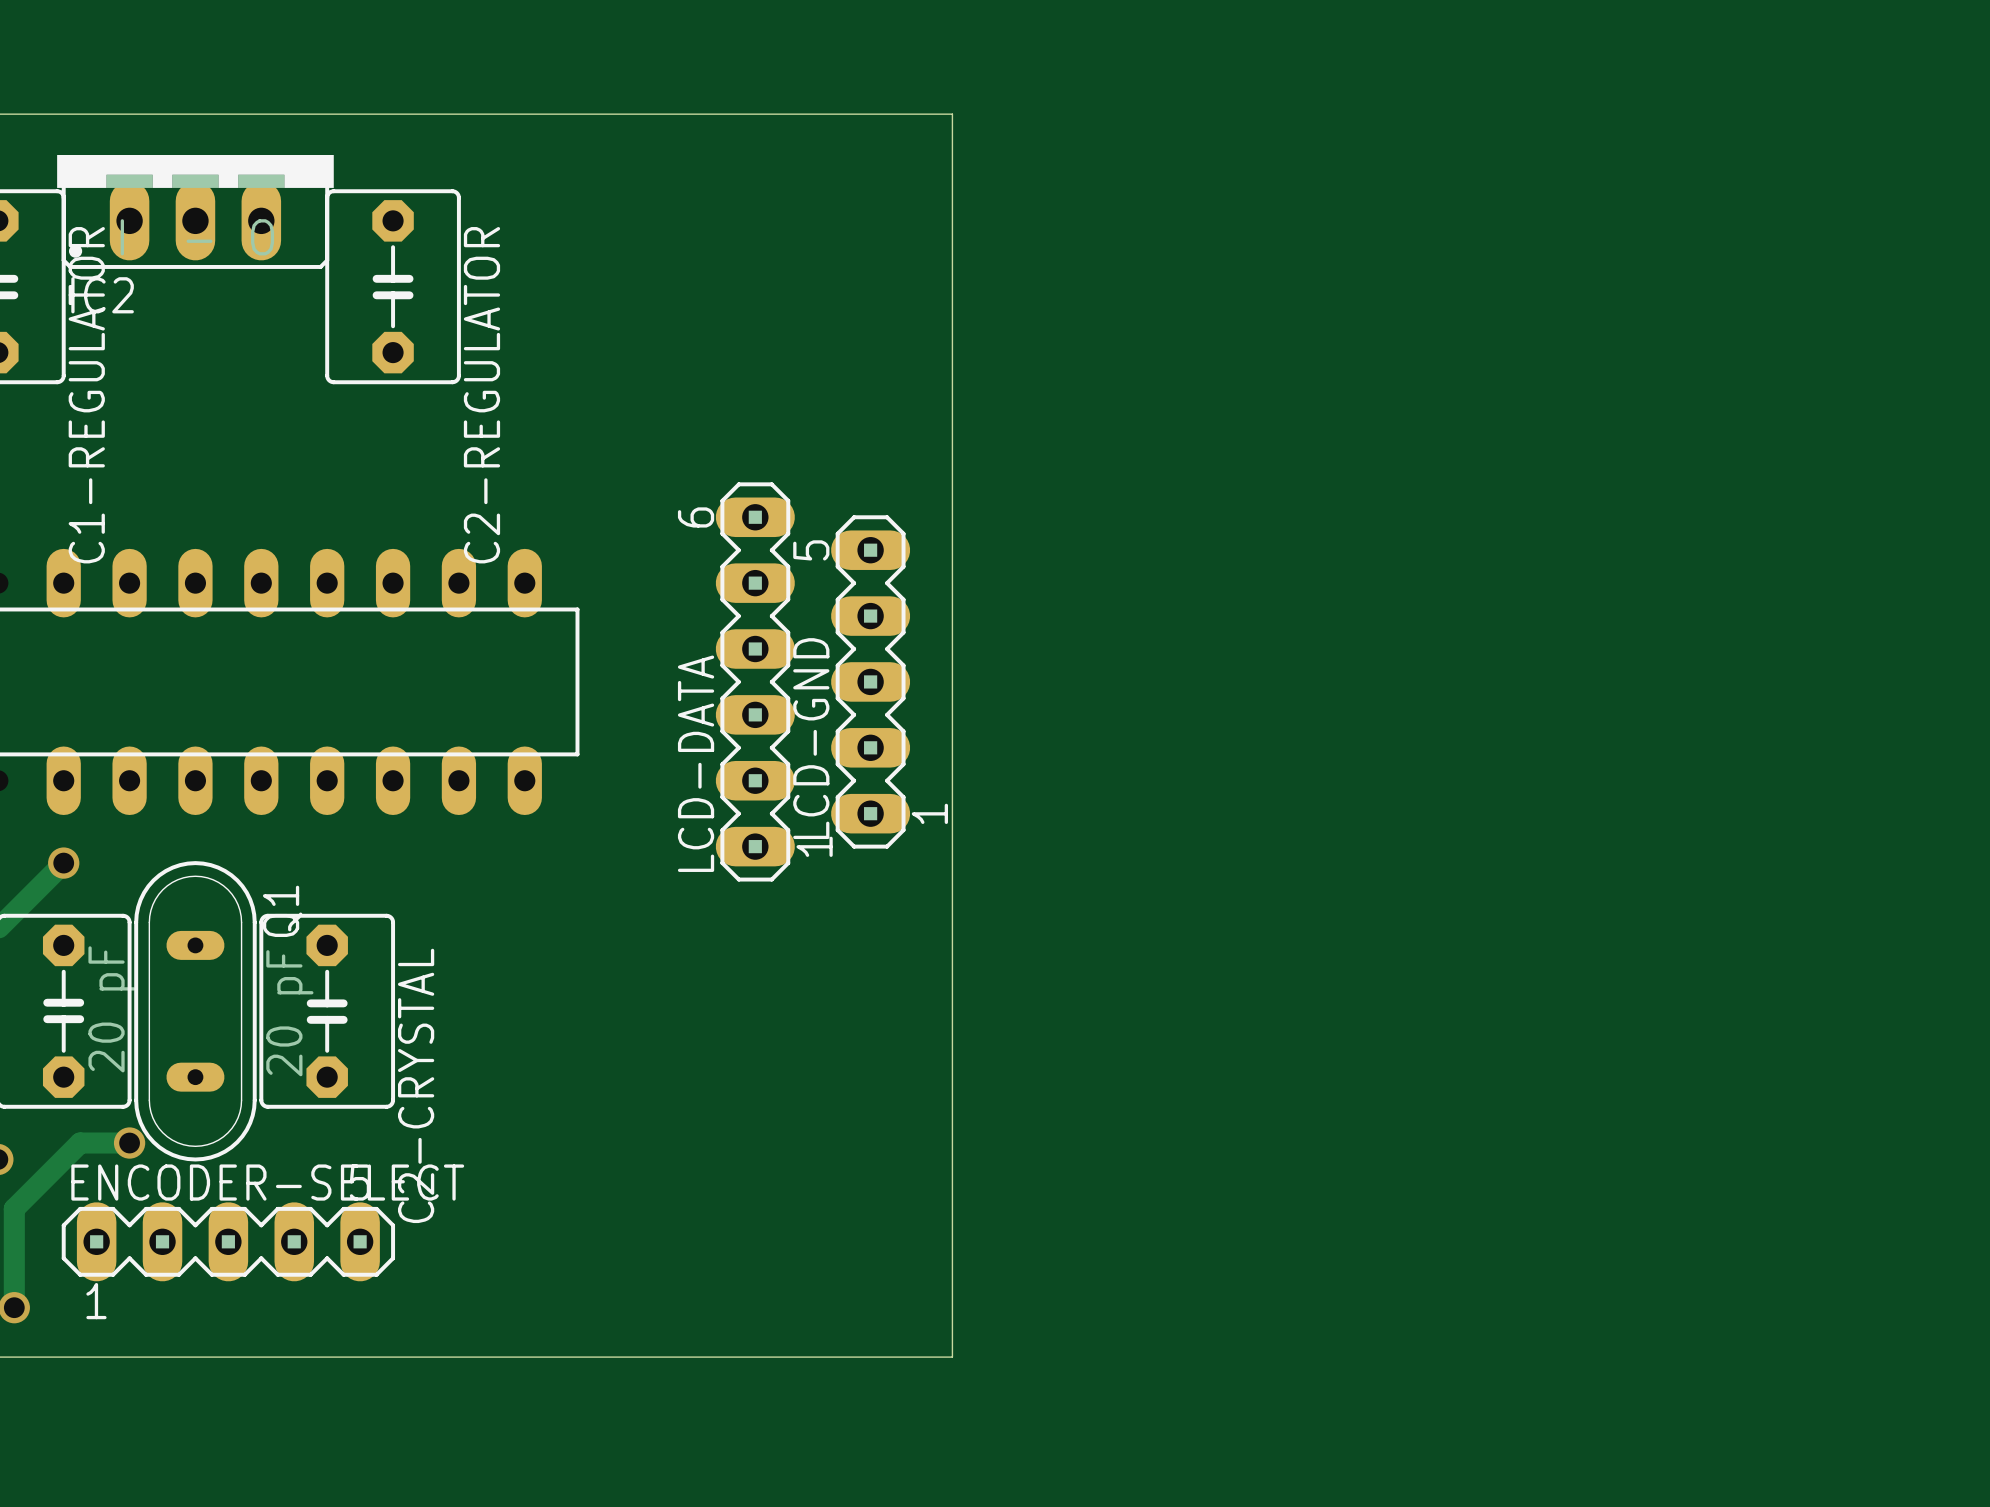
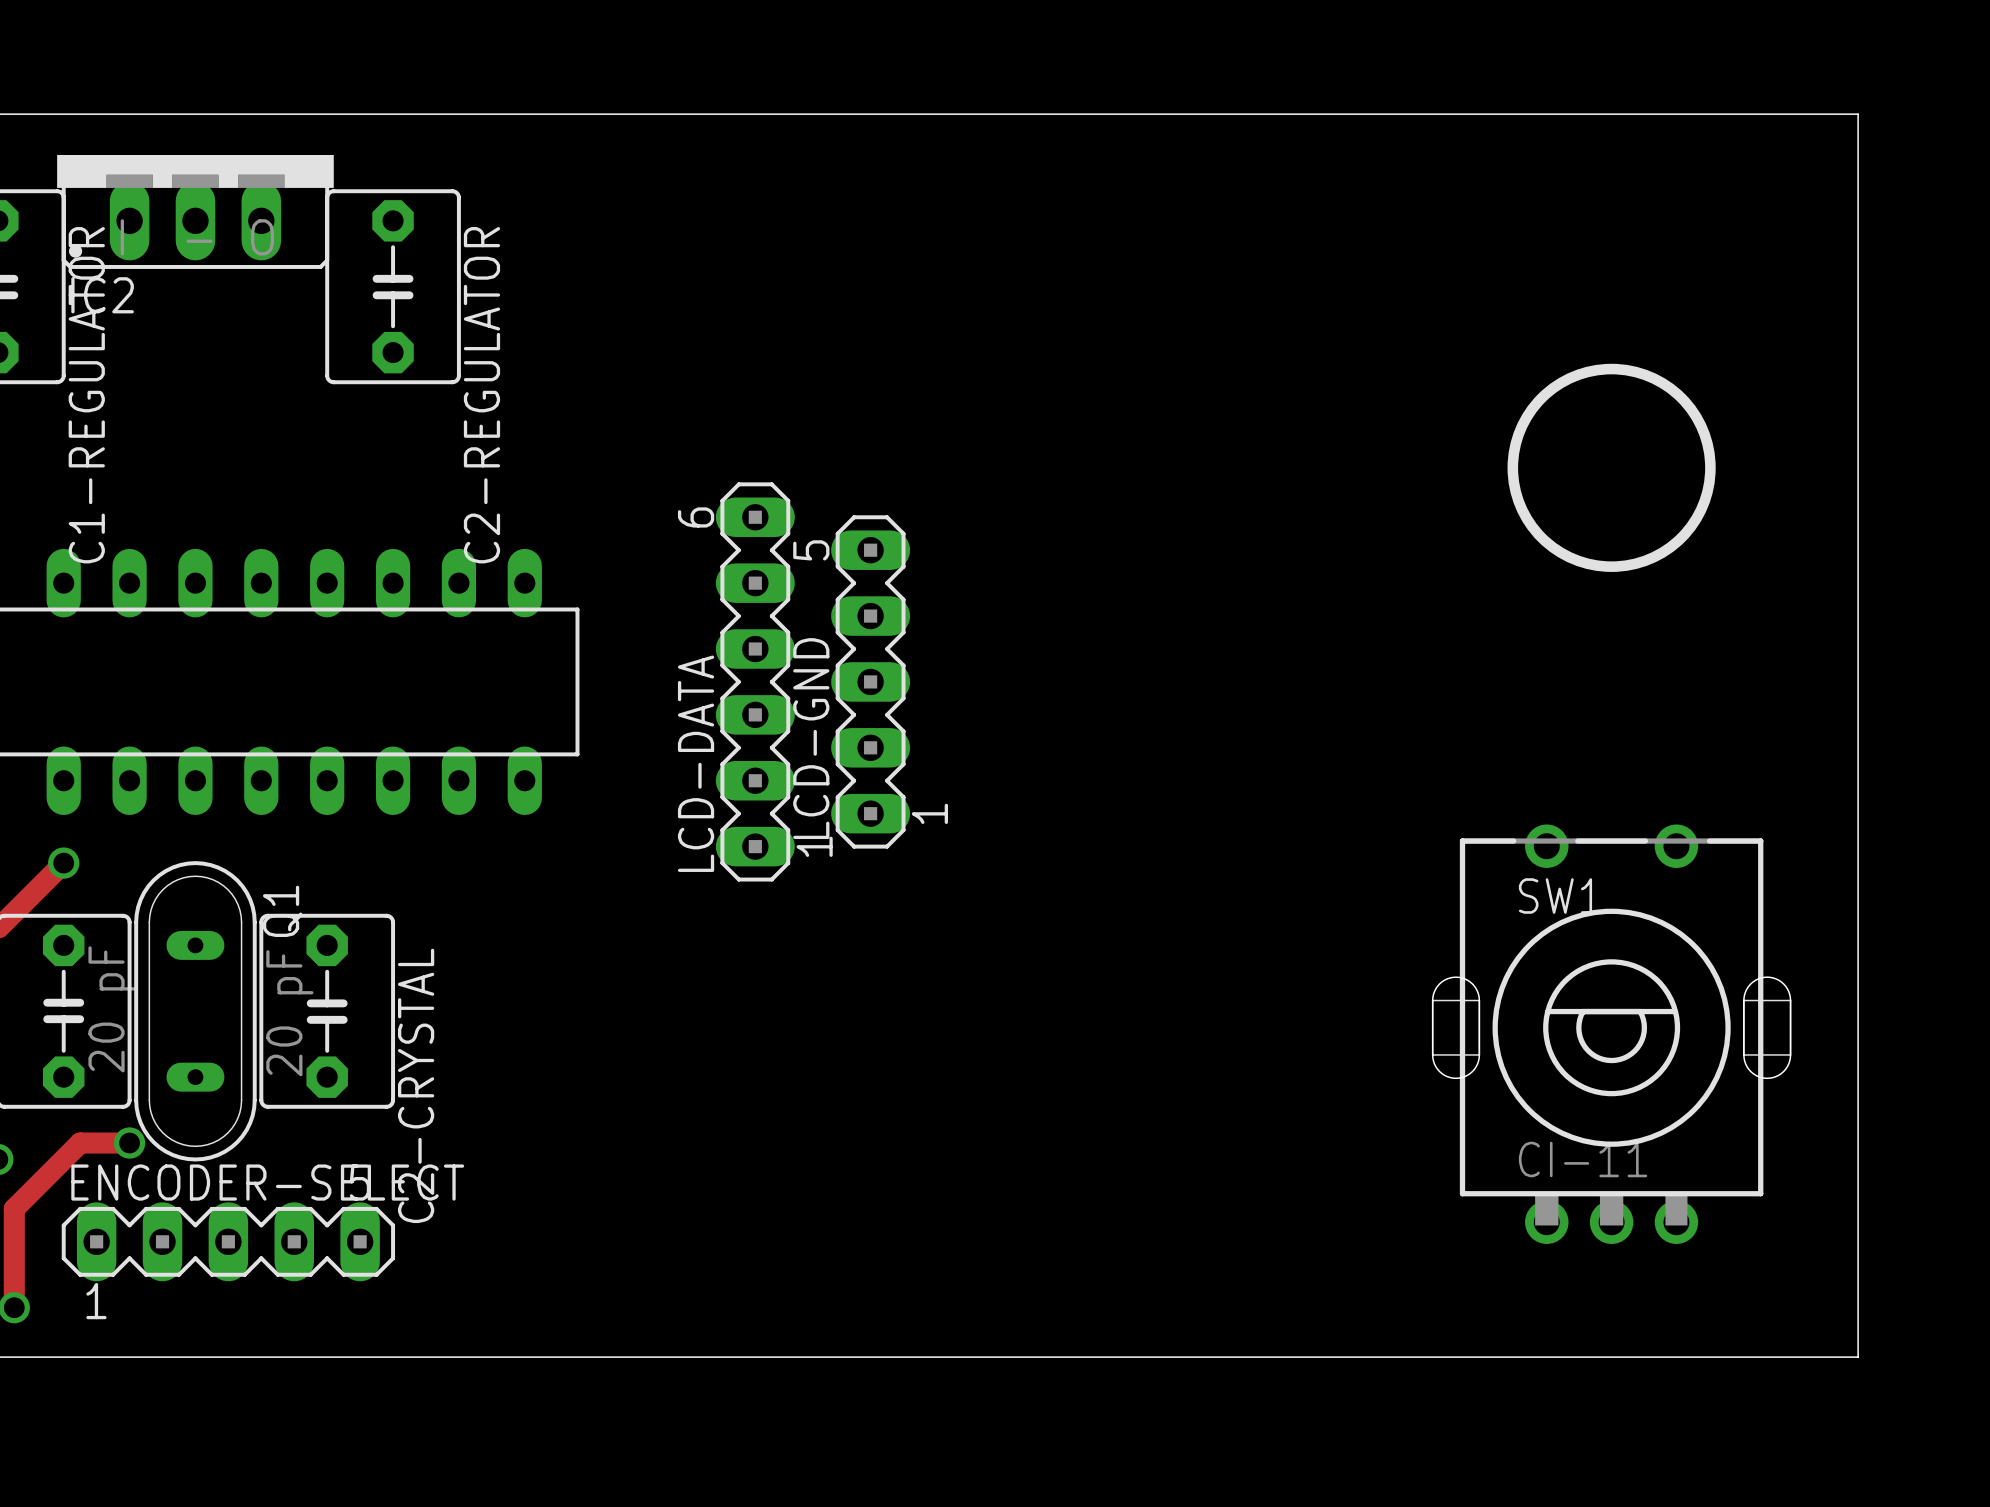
board edge: (952, 114) (952, 1357) -> (952, 114) (1858, 114) (1858, 1357) (952, 1357)
drawing: none -> [1507, 363, 1716, 572]
SW1: none -> CI-11 (1611, 1034)

